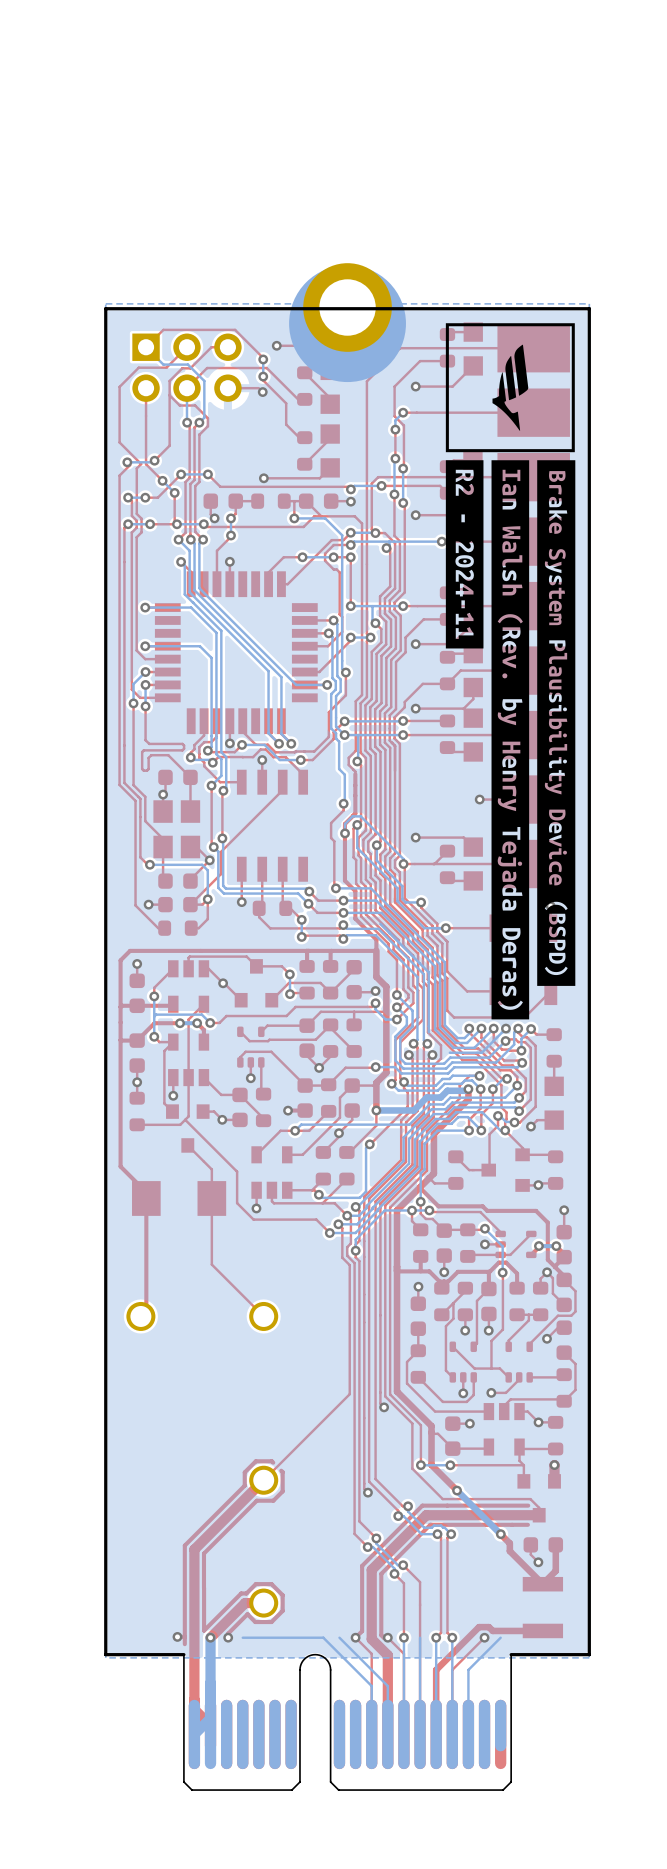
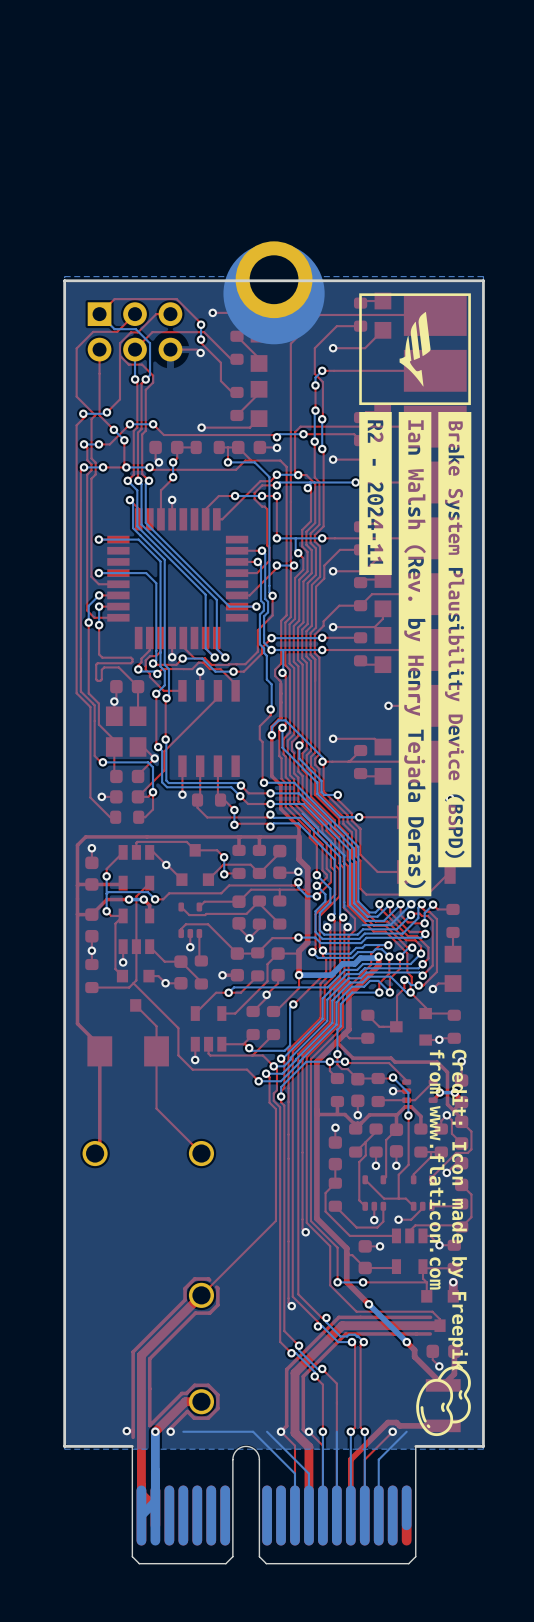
text: none -> from www.flaticon.com (437, 1169)
text: none -> Credit: Icon made by Freepik (458, 1210)
drawing: none -> [416, 1366, 471, 1437]

